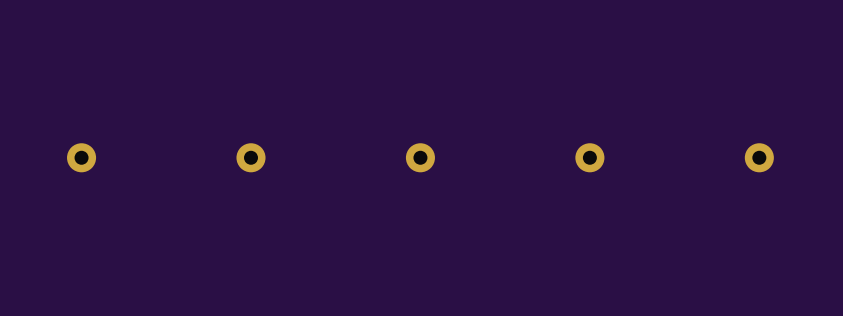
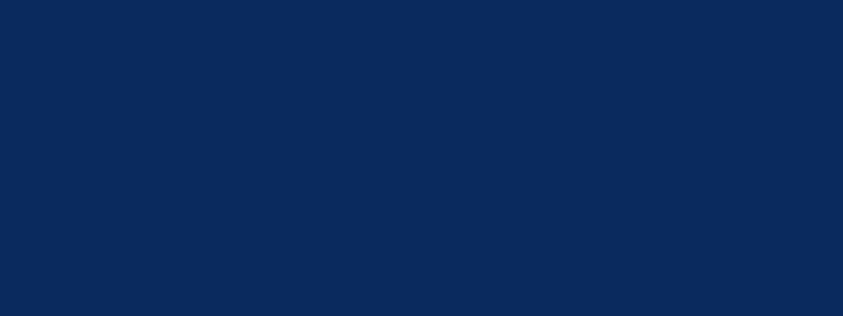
via: (81, 157) -> none
via: (250, 157) -> none
via: (420, 157) -> none
via: (589, 157) -> none
via: (759, 157) -> none

